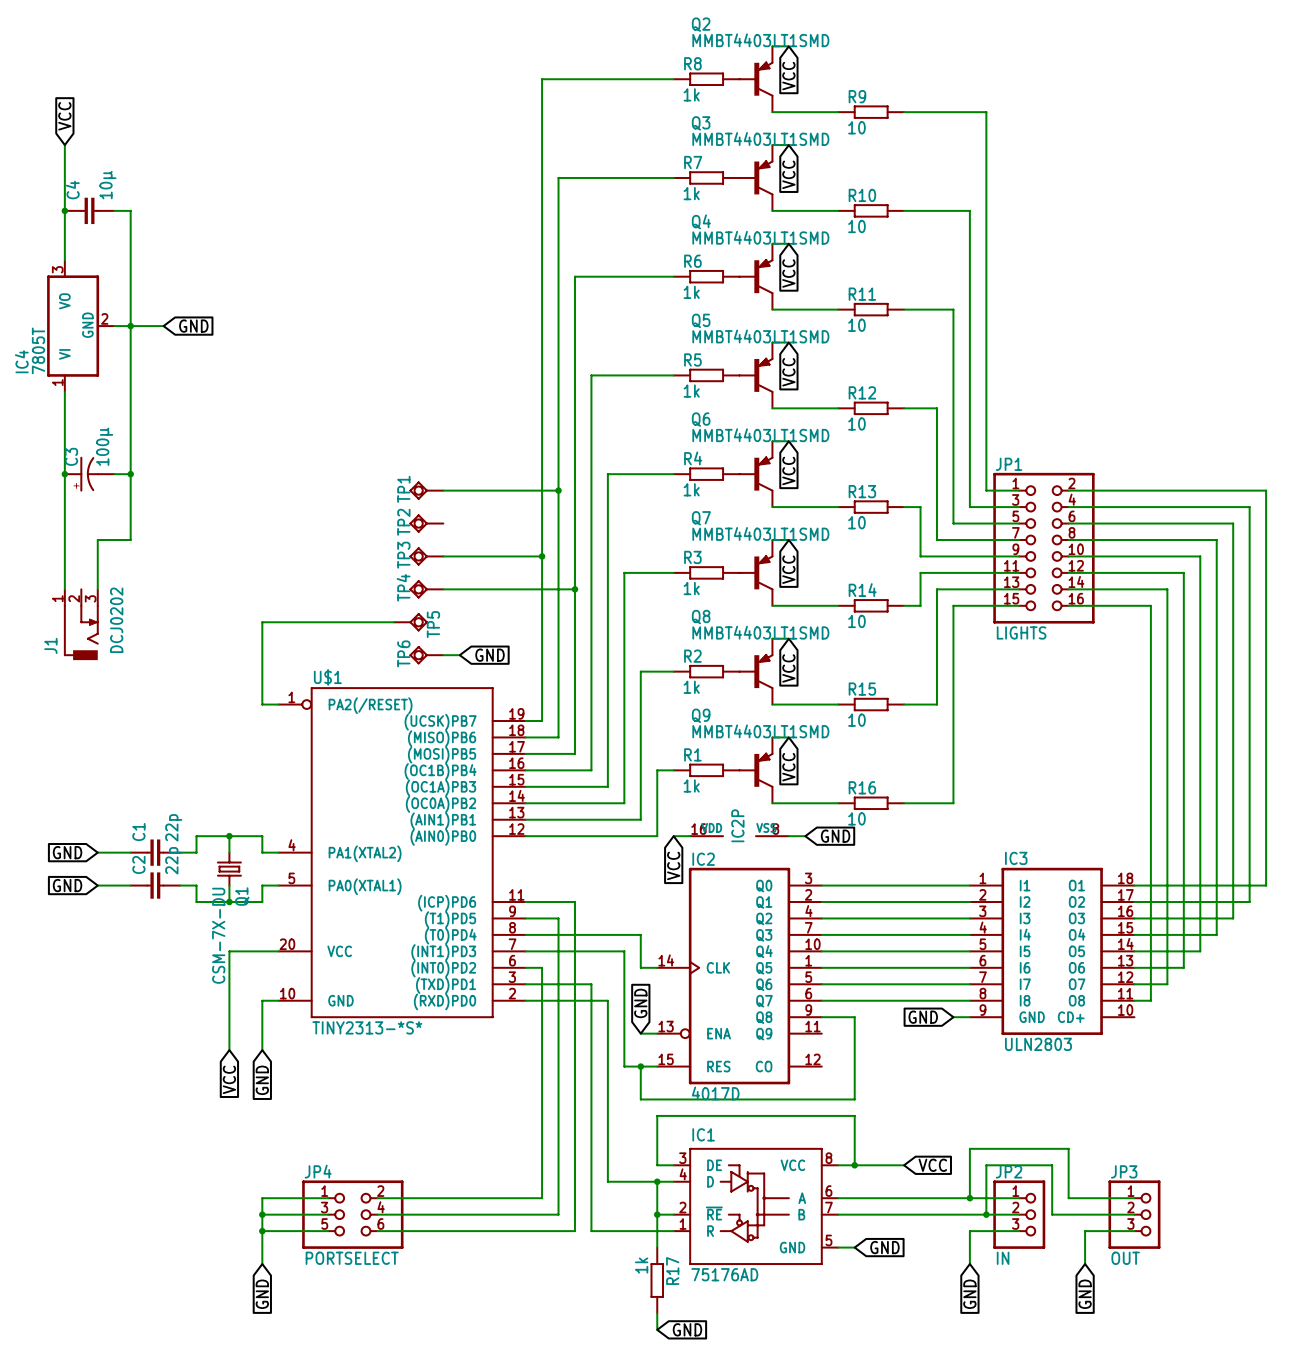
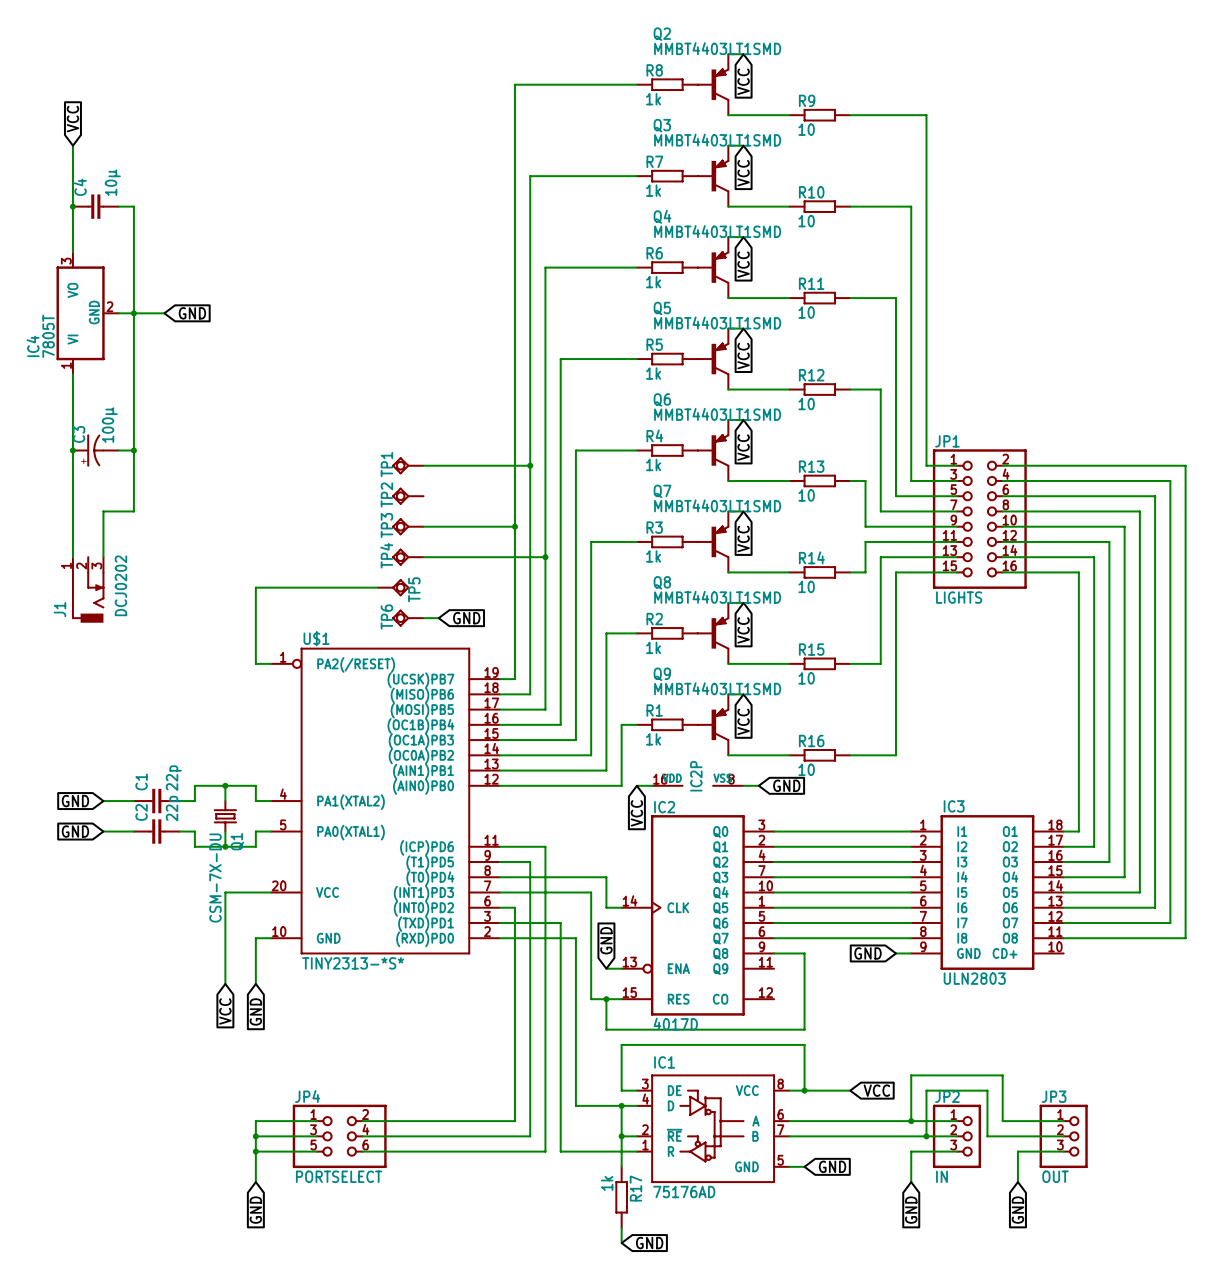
wire: (1266, 885) (1150, 885) (1150, 1000) -> (1185, 831) (1185, 938) (1078, 938)
wire: (1249, 902) (1167, 902) (1167, 984) -> (1170, 846) (1170, 922) (1094, 922)
wire: (1233, 918) (1183, 918) (1183, 967) -> (1155, 862) (1155, 907) (1109, 907)
wire: (1216, 934) (1200, 934) (1200, 951) -> (1139, 877) (1139, 892) (1124, 892)

